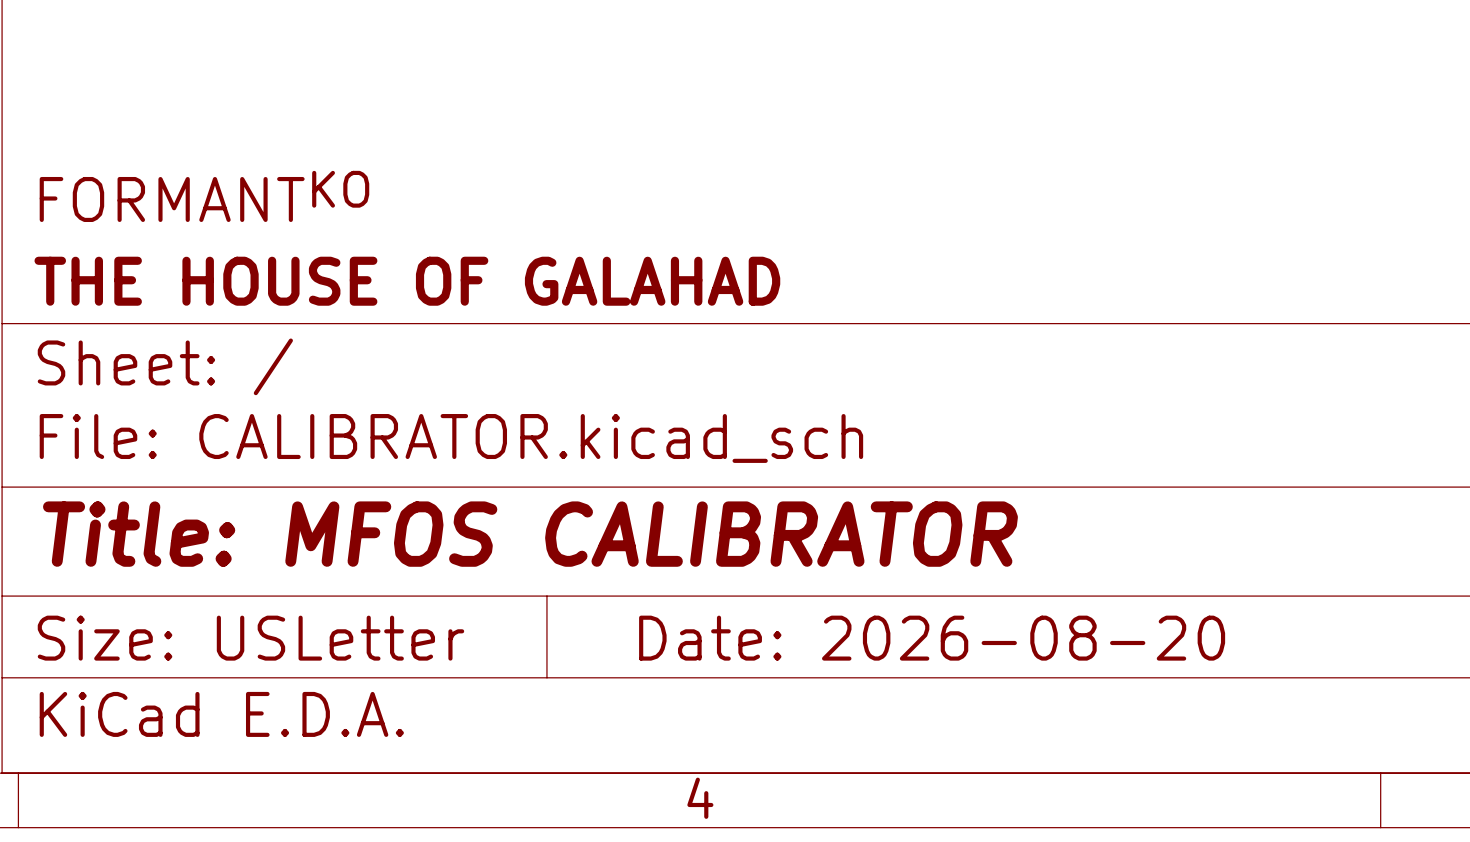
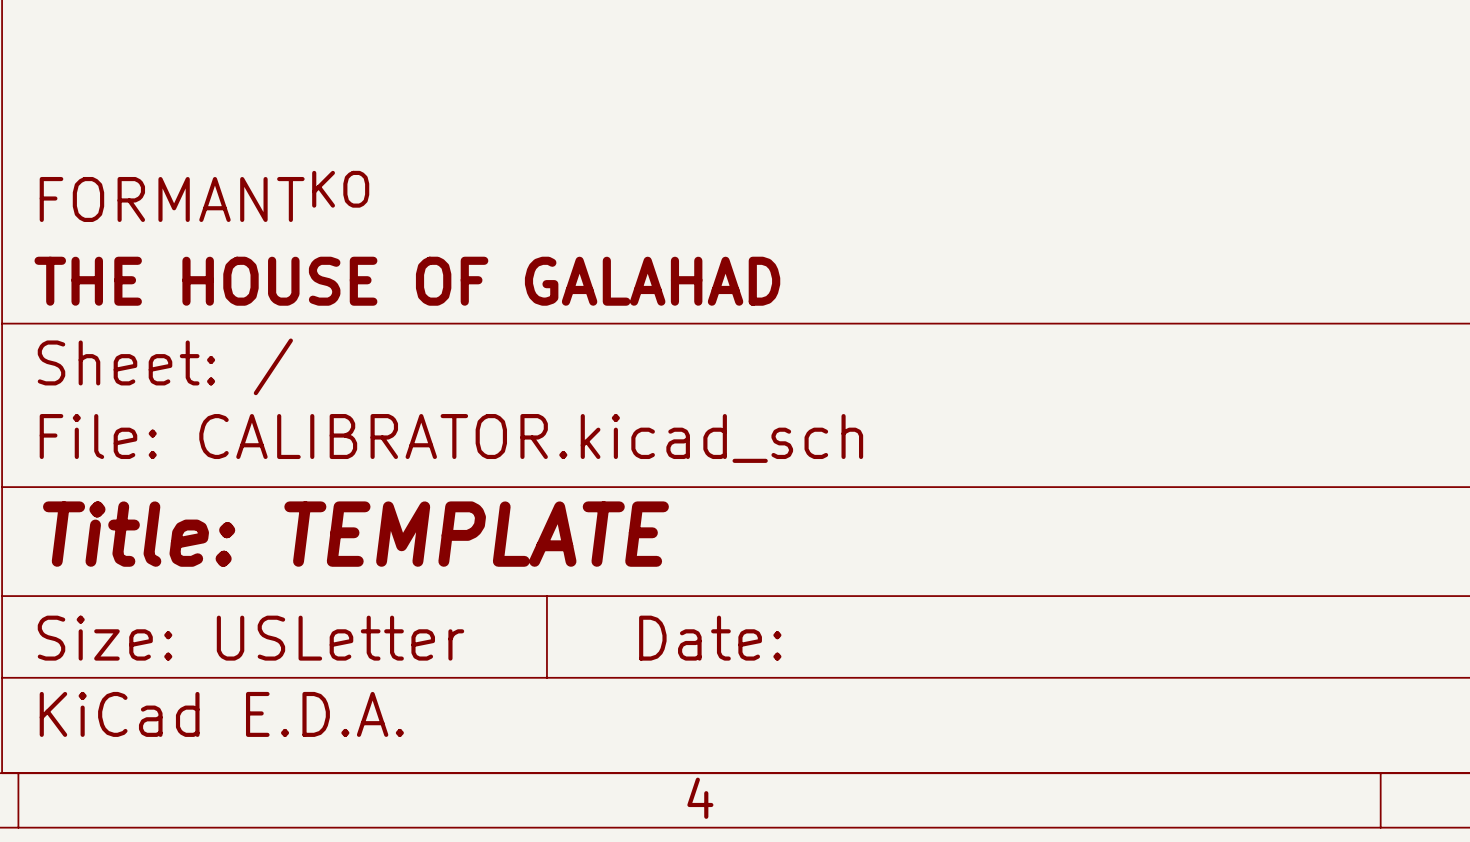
title block: Title: MFOS CALIBRATOR (530, 534) -> Title: TEMPLATE (355, 534)
title block: Date: 2026-08-20 (932, 638) -> Date: (710, 638)

